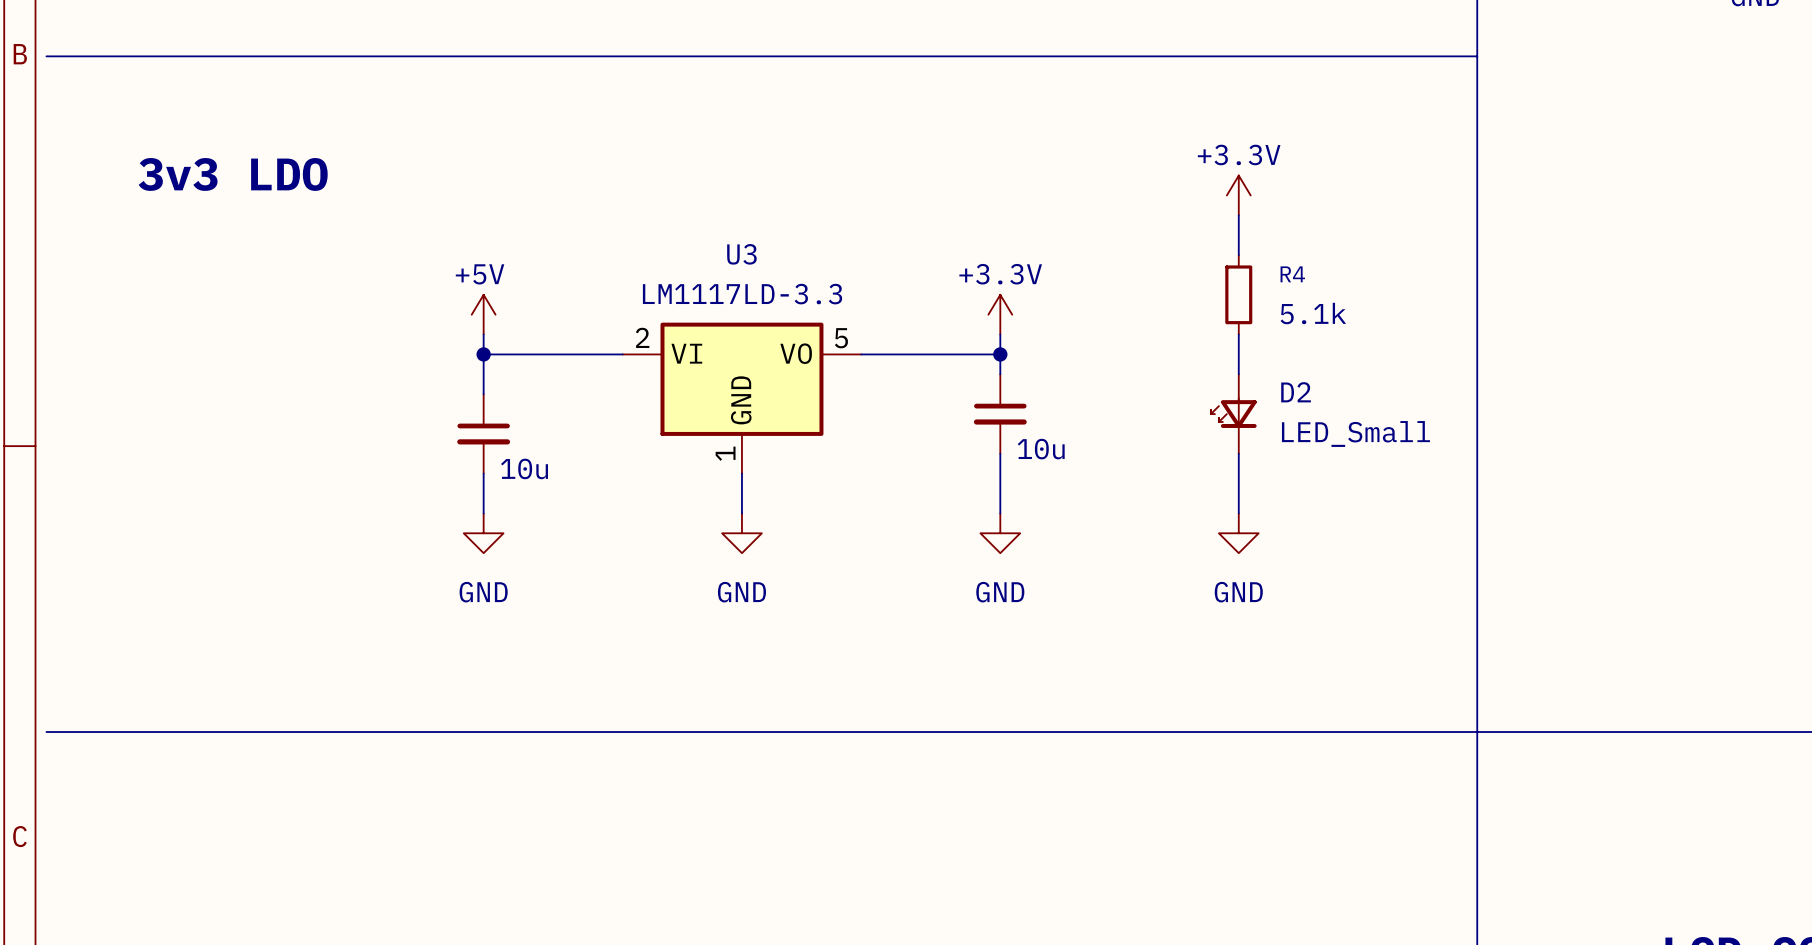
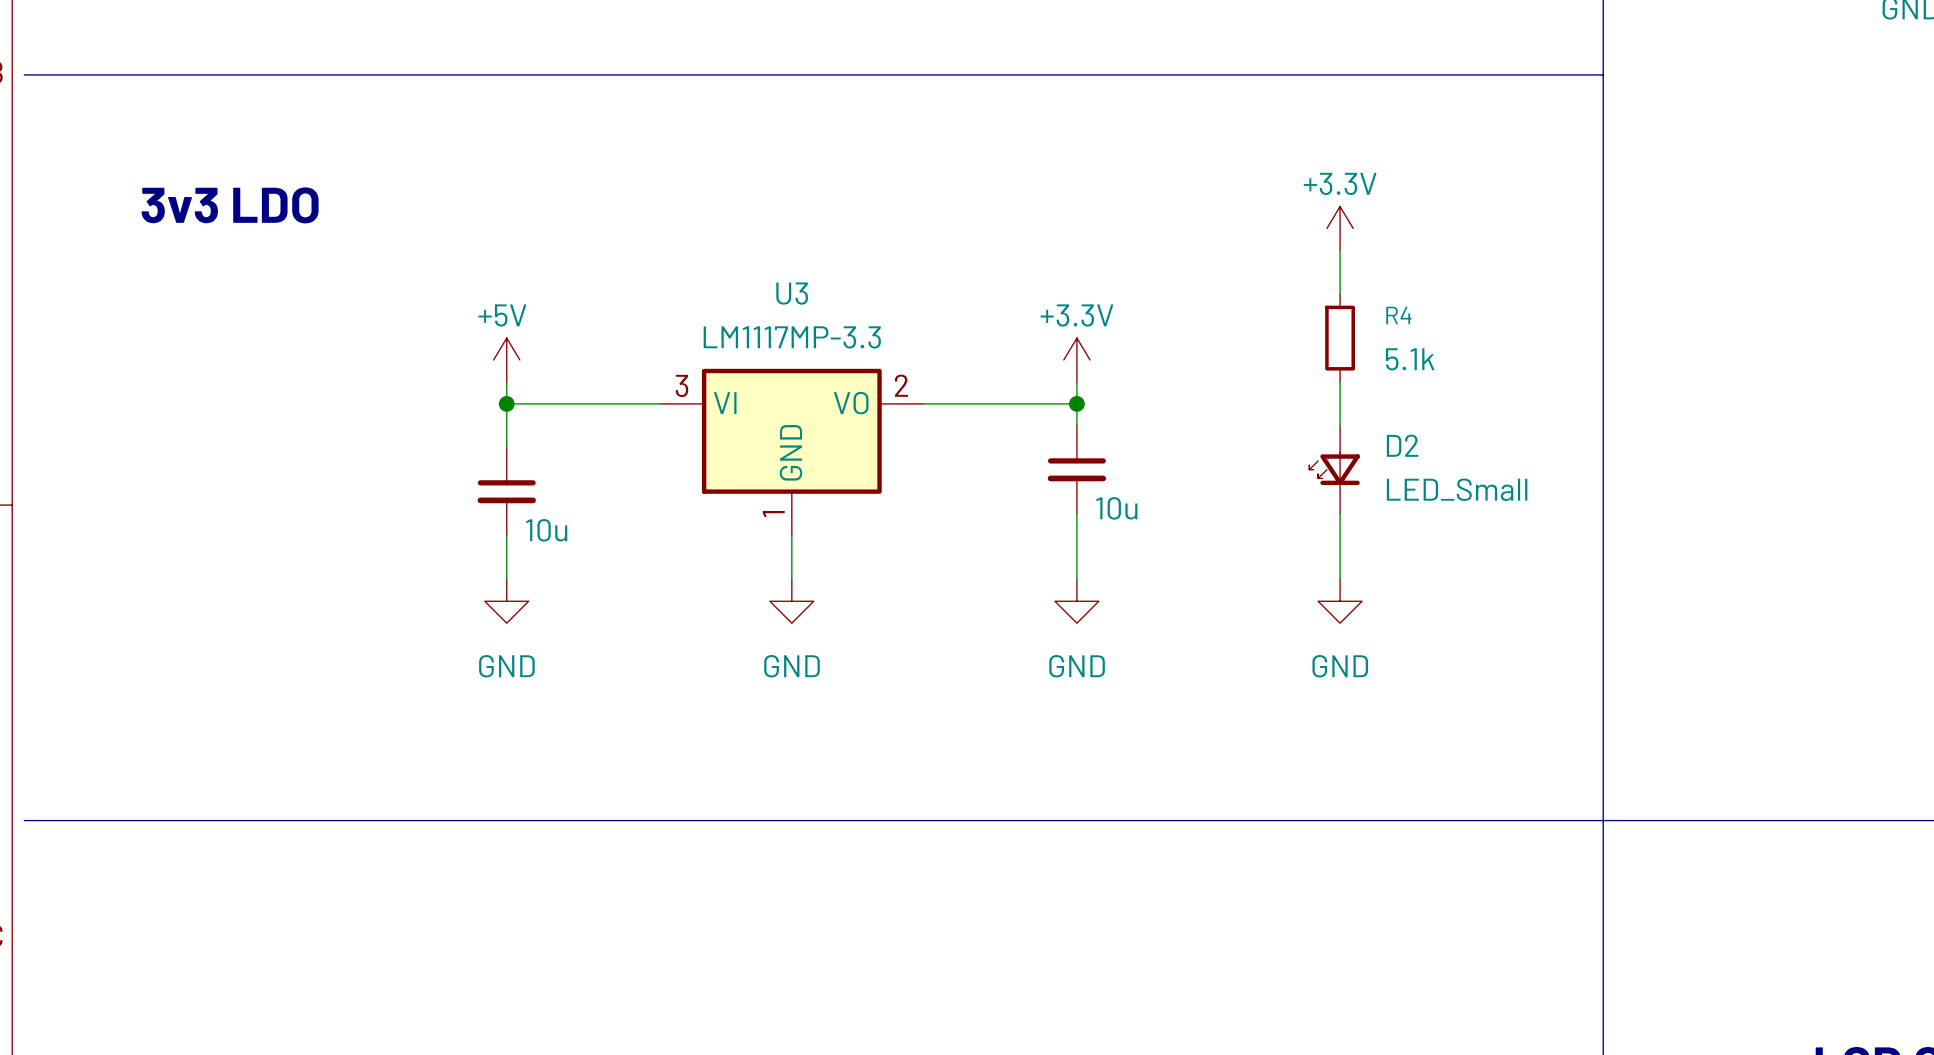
U3 value: LM1117LD-3.3 (742, 294) -> LM1117MP-3.3 (792, 337)
U3 pin number: 2 (642, 337) -> 3 (681, 385)
U3 pin number: 5 (841, 338) -> 2 (901, 385)

